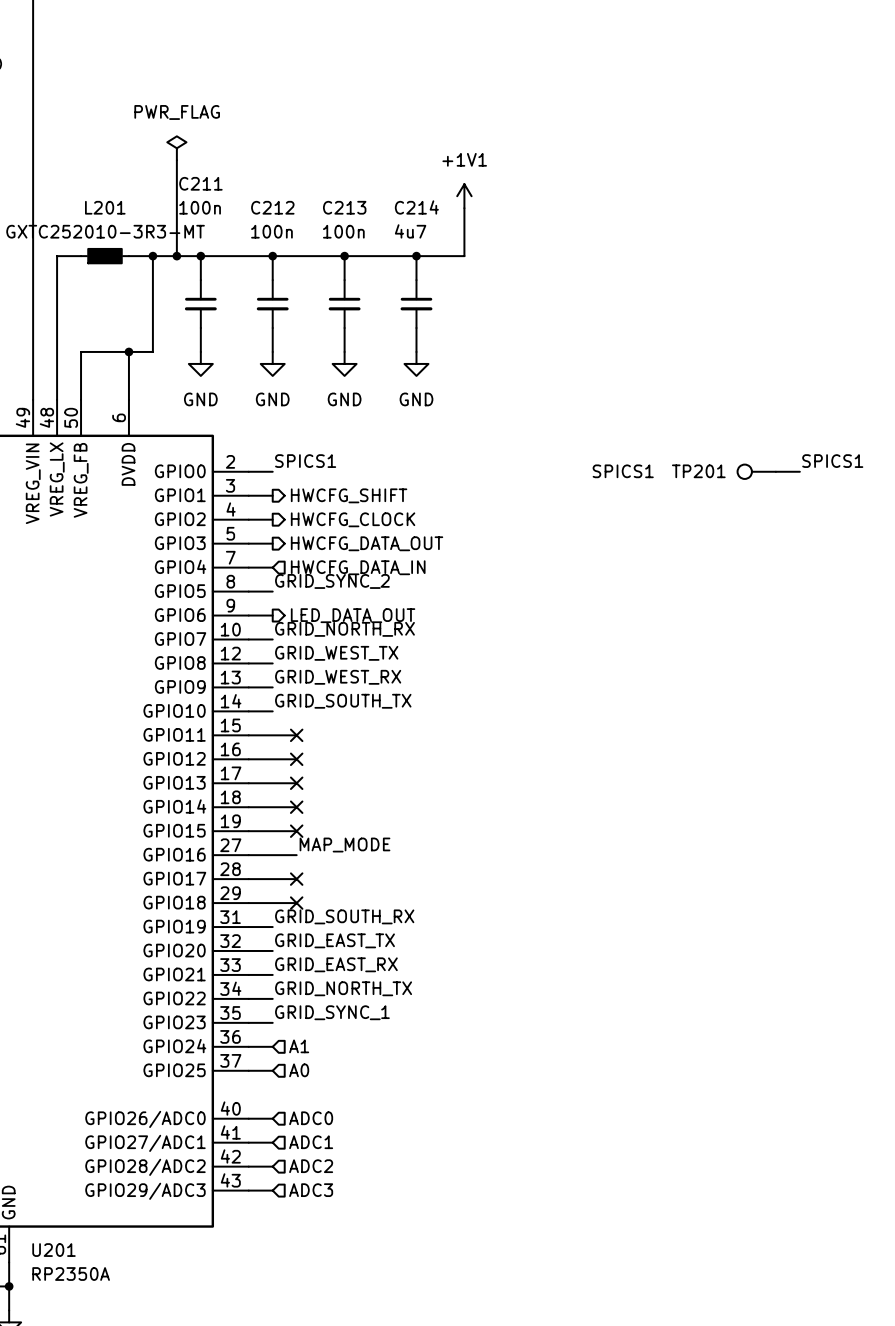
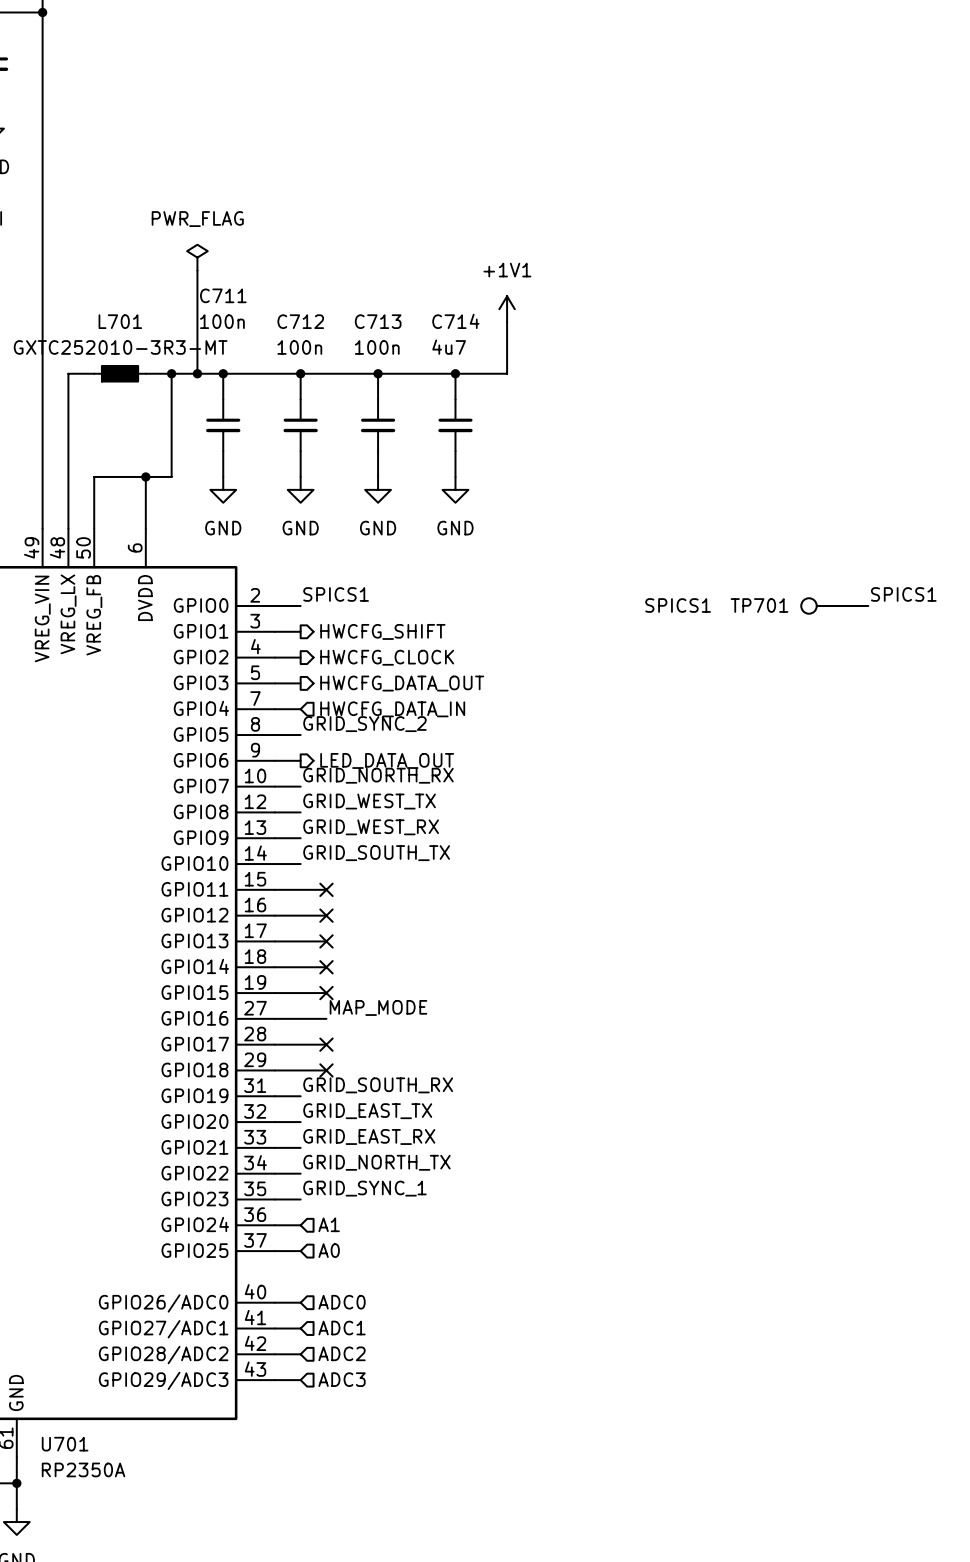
C211 name: C211 (200, 183) -> C711 (223, 295)
L201 name: L201 (105, 207) -> L701 (120, 321)
C212 name: C212 (272, 207) -> C712 (300, 321)
C213 name: C213 (344, 207) -> C713 (378, 321)
C214 name: C214 (416, 207) -> C714 (455, 321)
TP201 name: TP201 (698, 471) -> TP701 (759, 605)
U201 name: U201 (53, 1250) -> U701 (65, 1444)

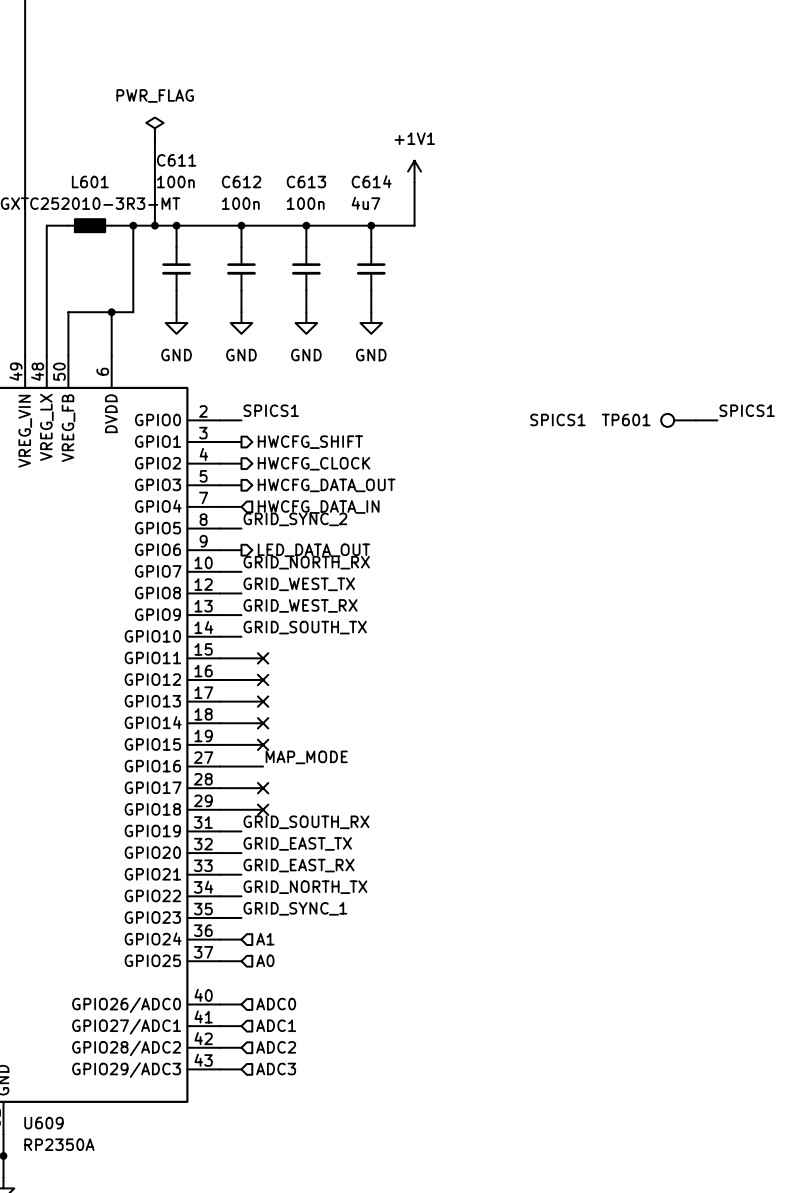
C711 name: C711 (223, 295) -> C611 (176, 160)
L701 name: L701 (120, 321) -> L601 (90, 182)
C712 name: C712 (300, 321) -> C612 (241, 182)
C713 name: C713 (378, 321) -> C613 (306, 182)
C714 name: C714 (455, 321) -> C614 (371, 181)
TP701 name: TP701 (759, 605) -> TP601 (626, 419)
U701 name: U701 (65, 1444) -> U609 (43, 1123)

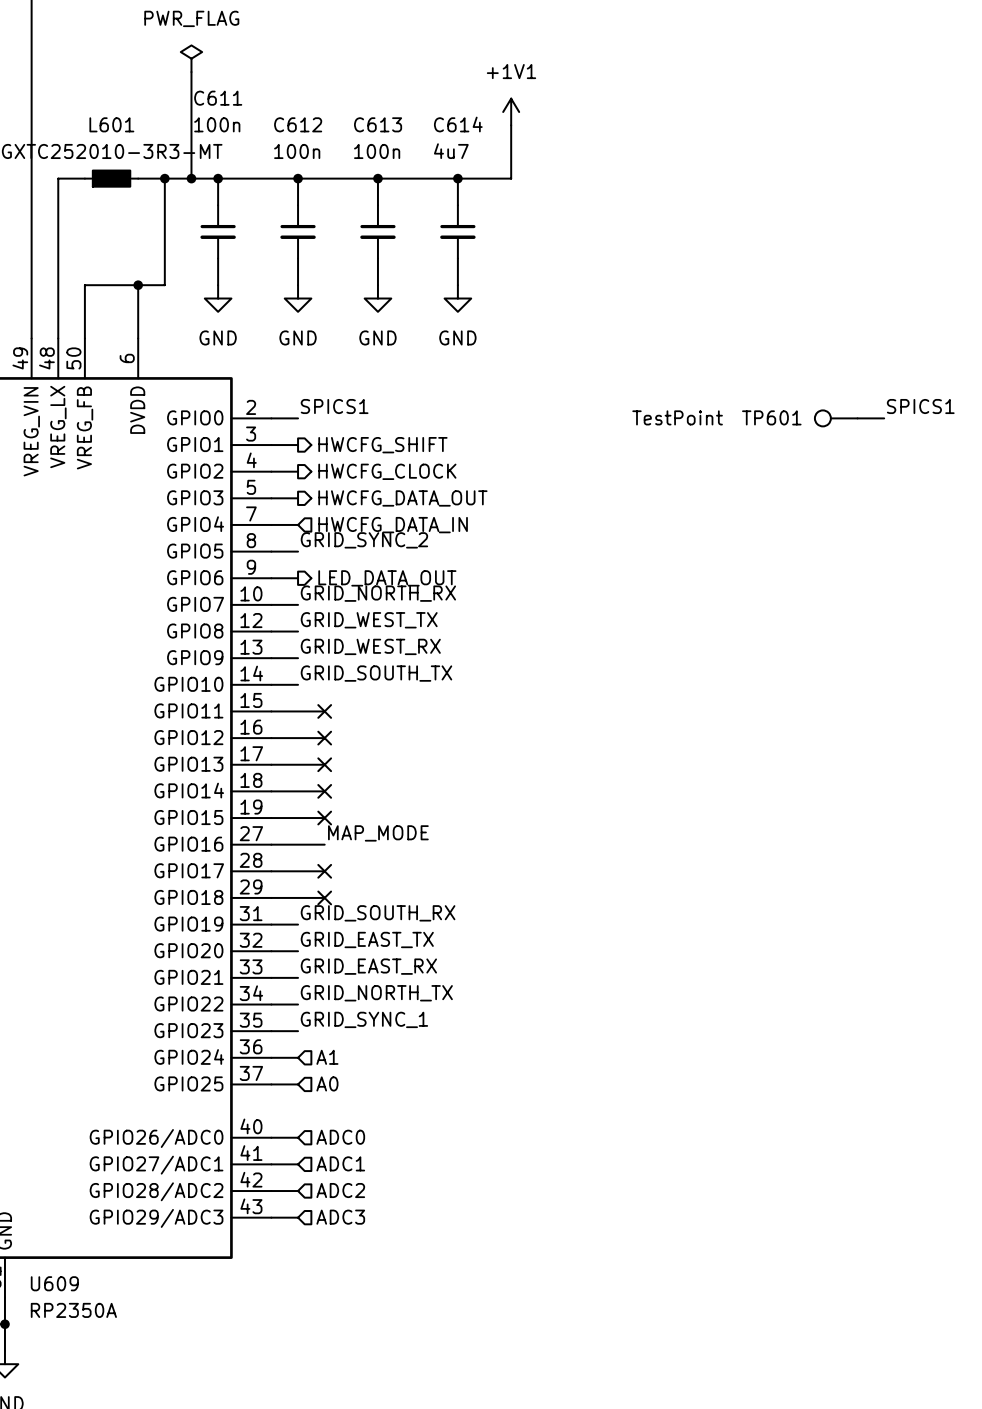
TP601 value: SPICS1 (557, 419) -> TestPoint (677, 417)

